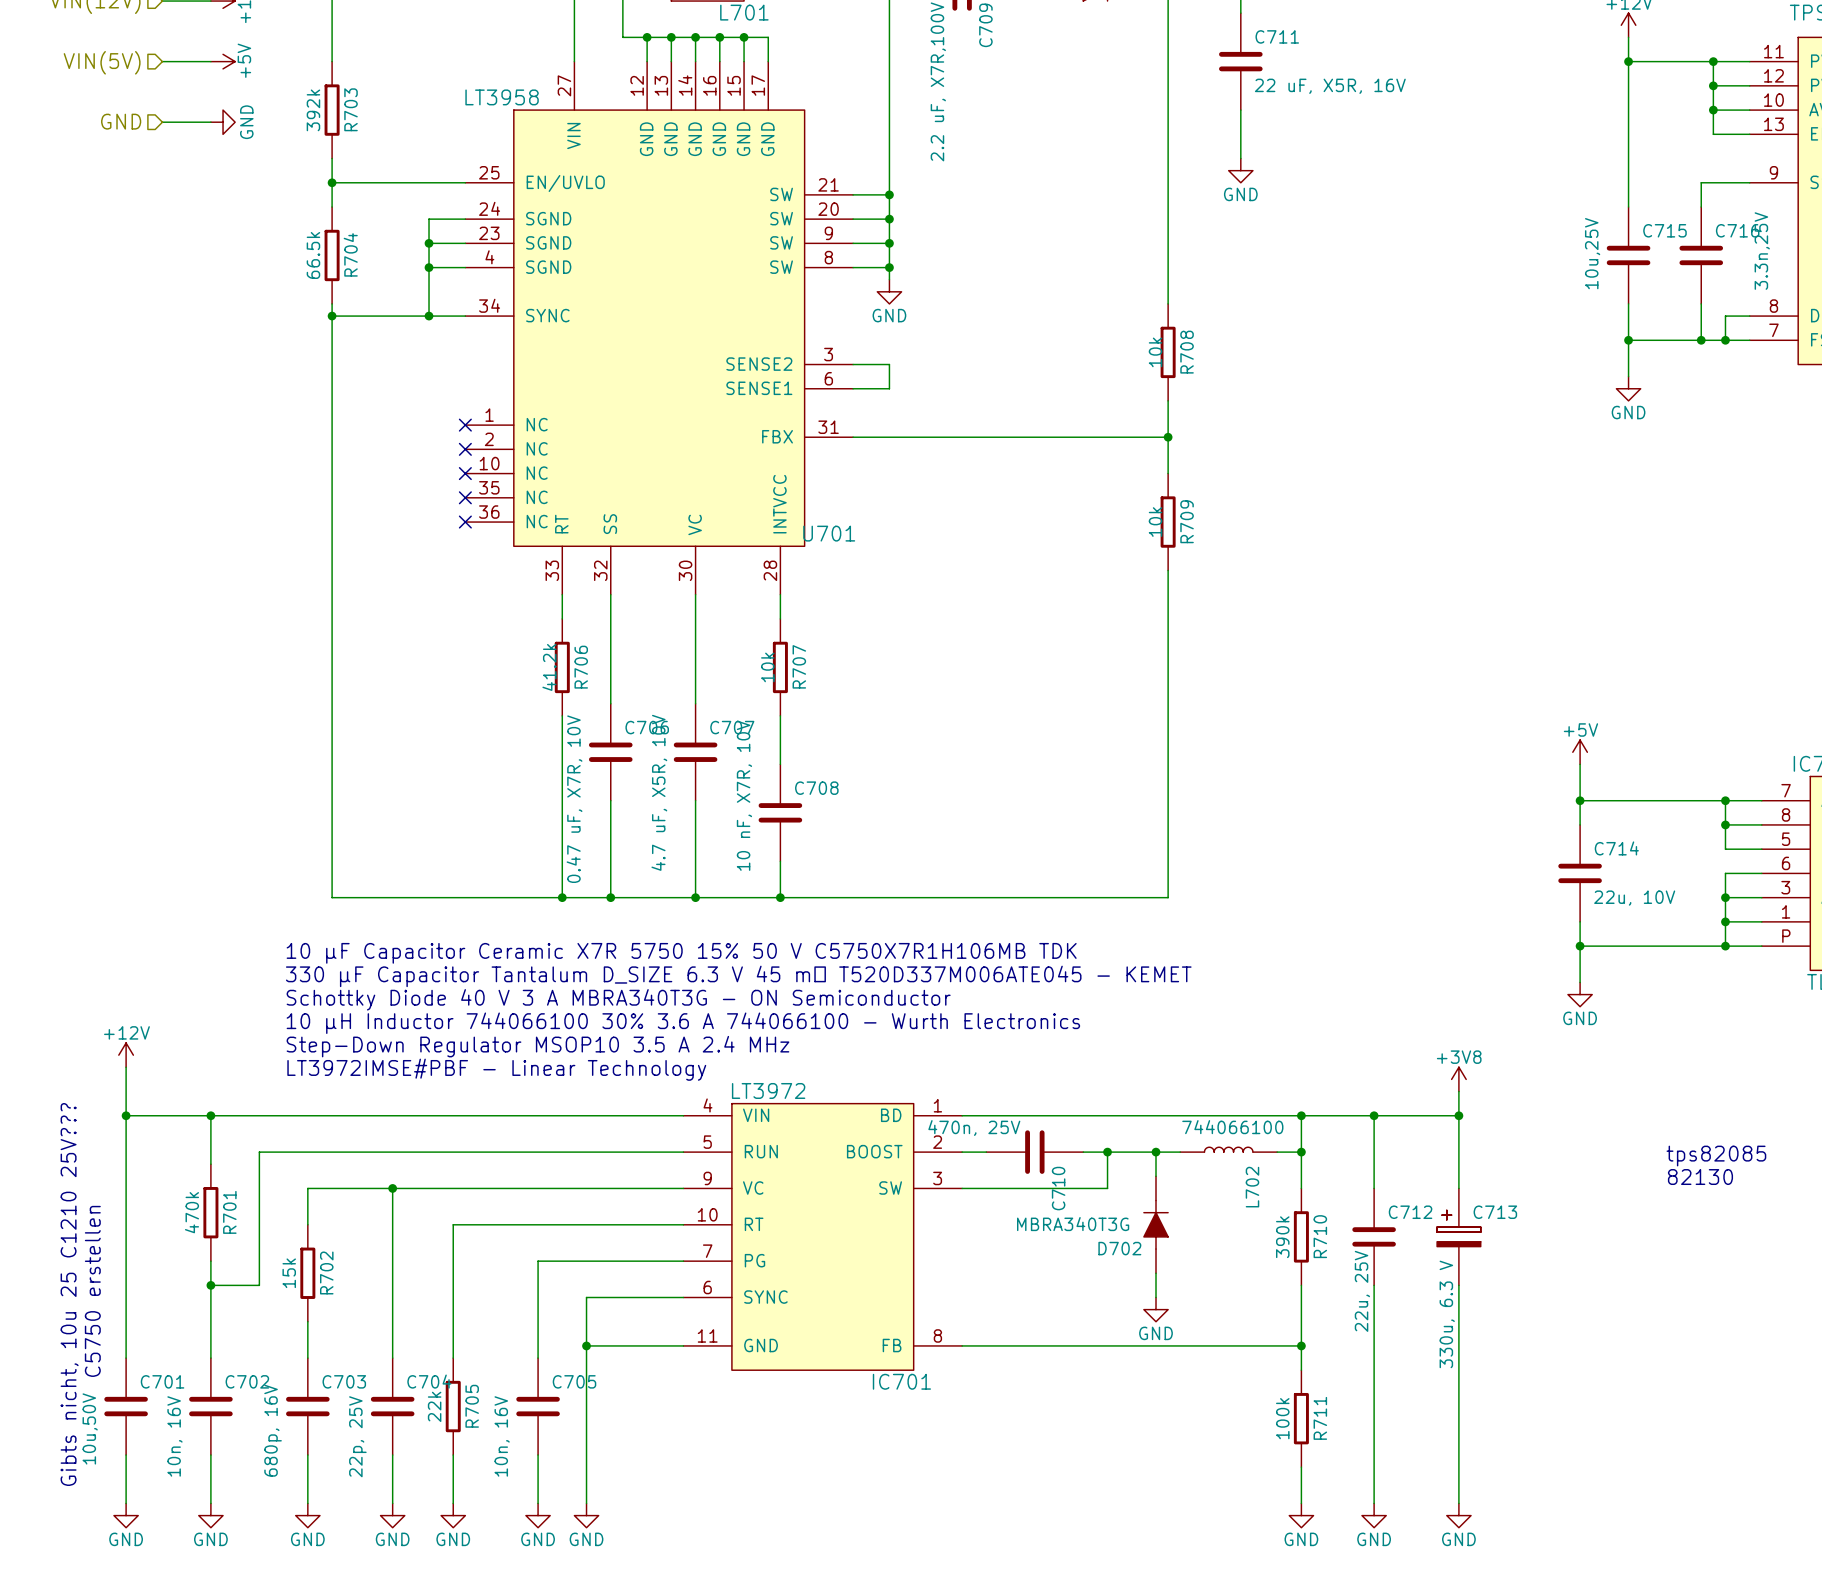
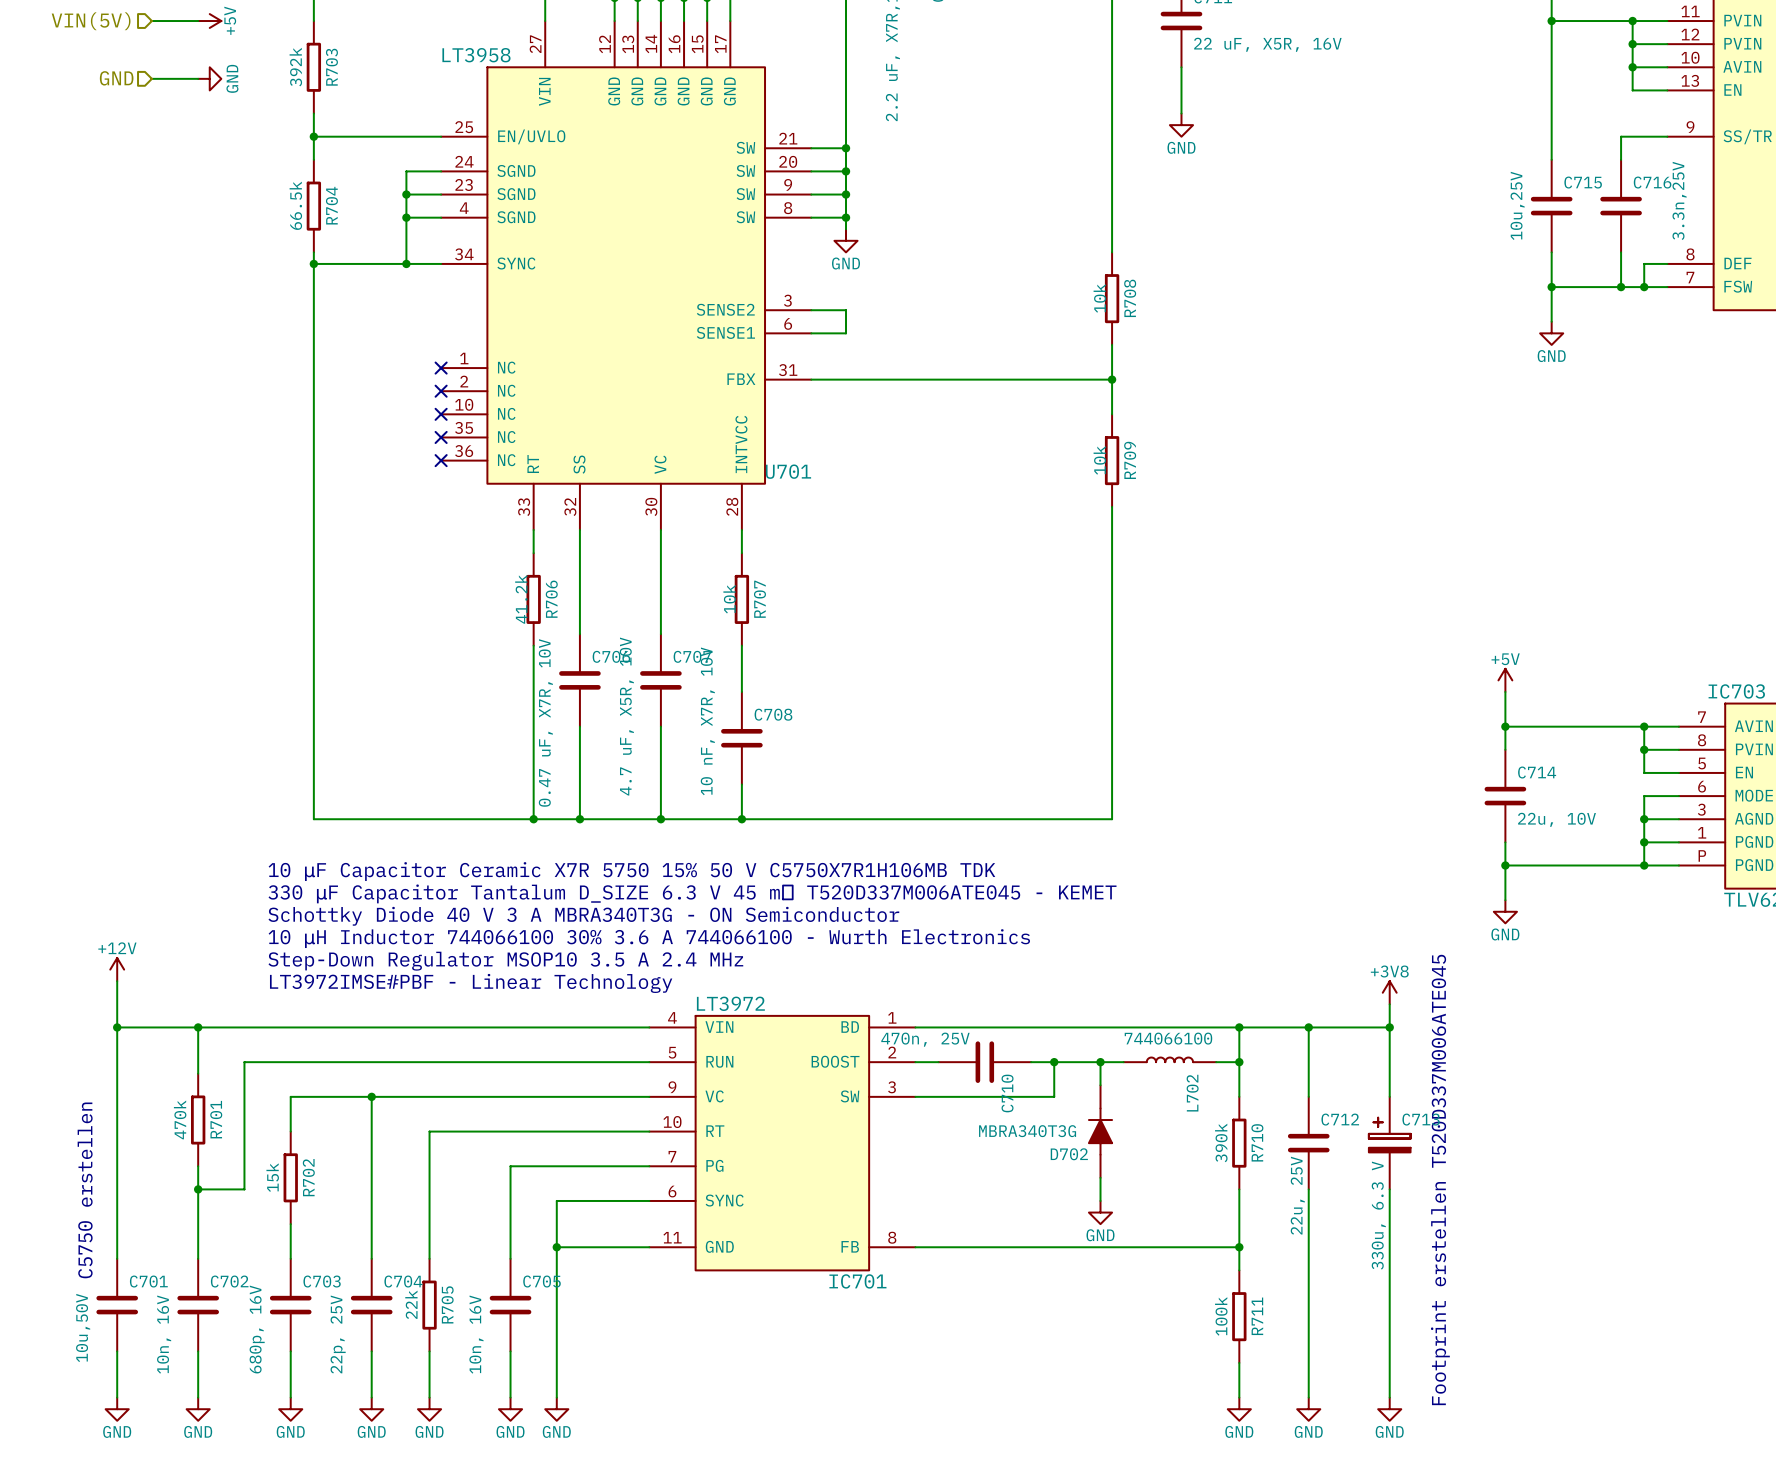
text: tps82085 (1716, 1156) -> none
text: 82130 (1700, 1177) -> none
text: none -> Footprint erstellen T520D337M006ATE045 (1440, 1179)
text: Gibts nicht, 10u 25 C1210 25V??? (69, 1294) -> none

